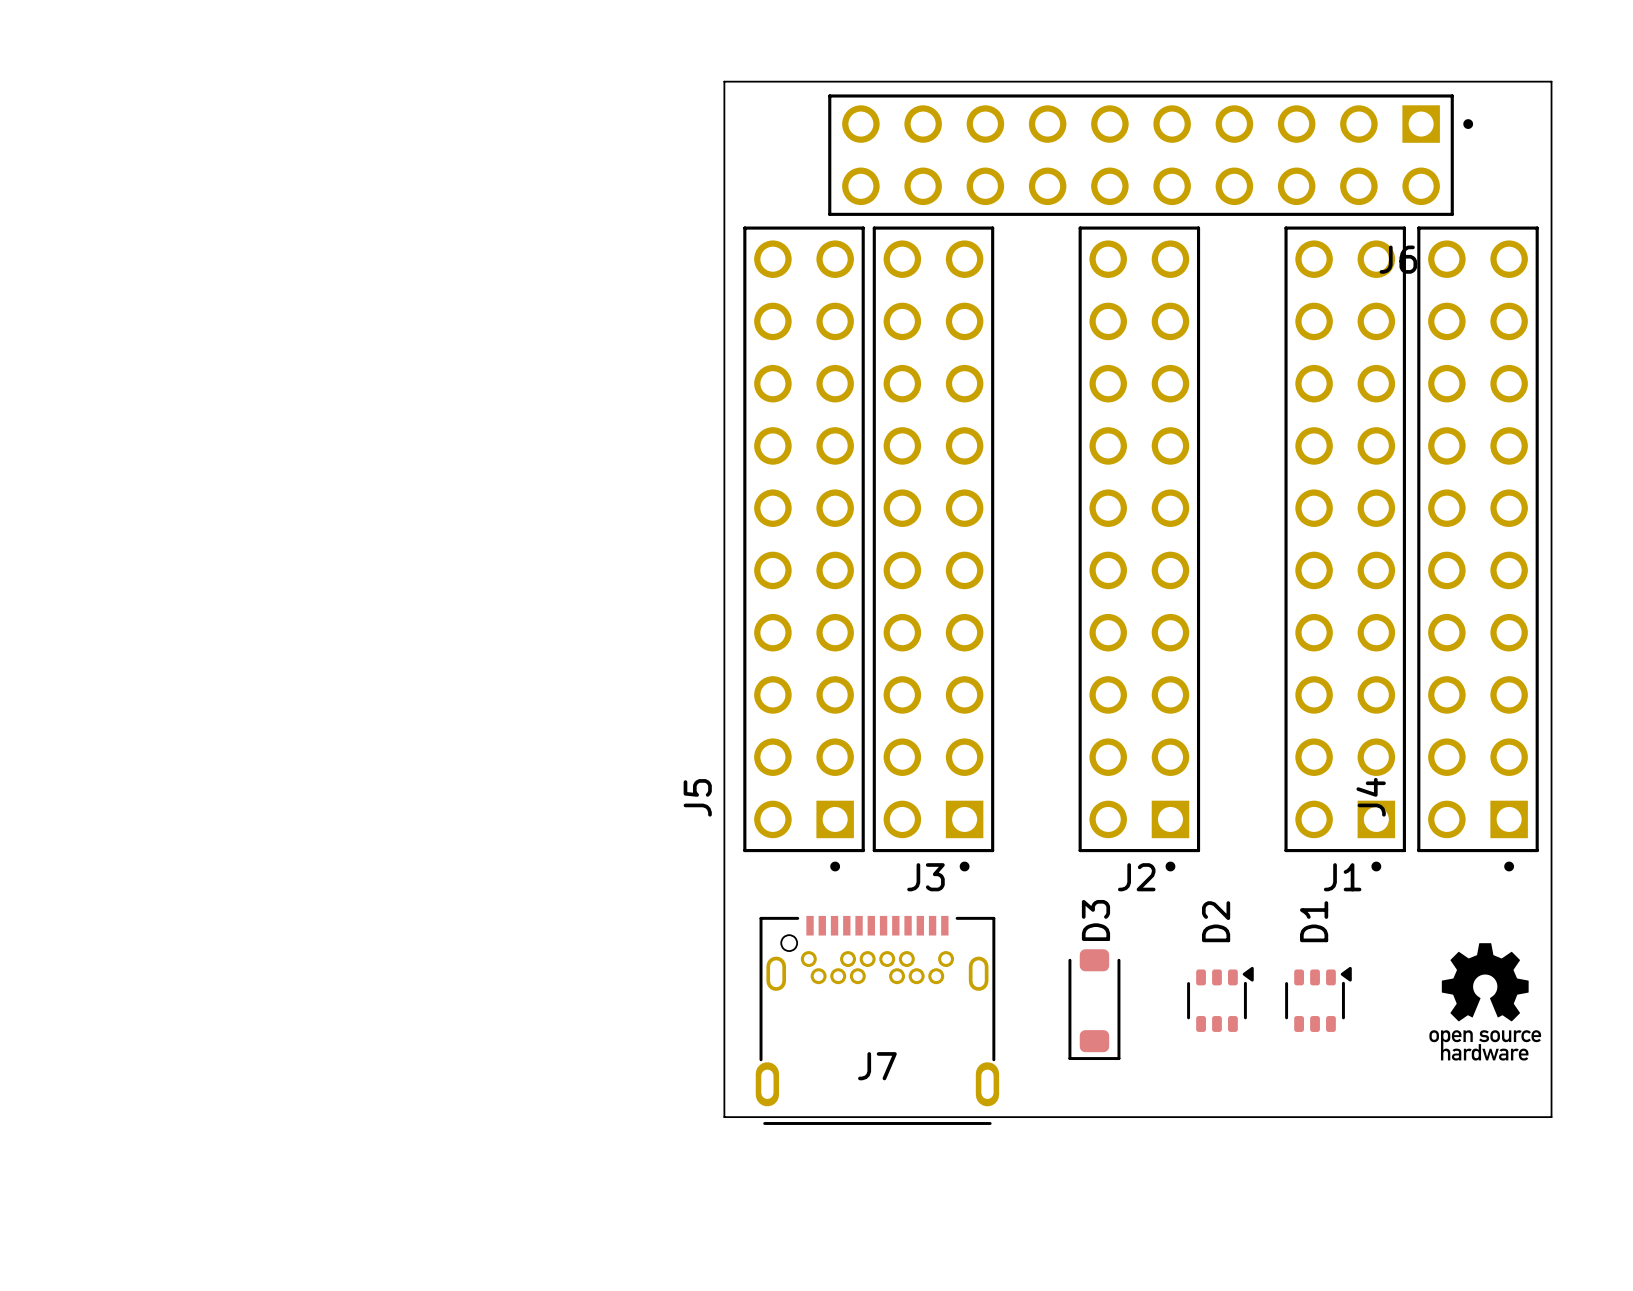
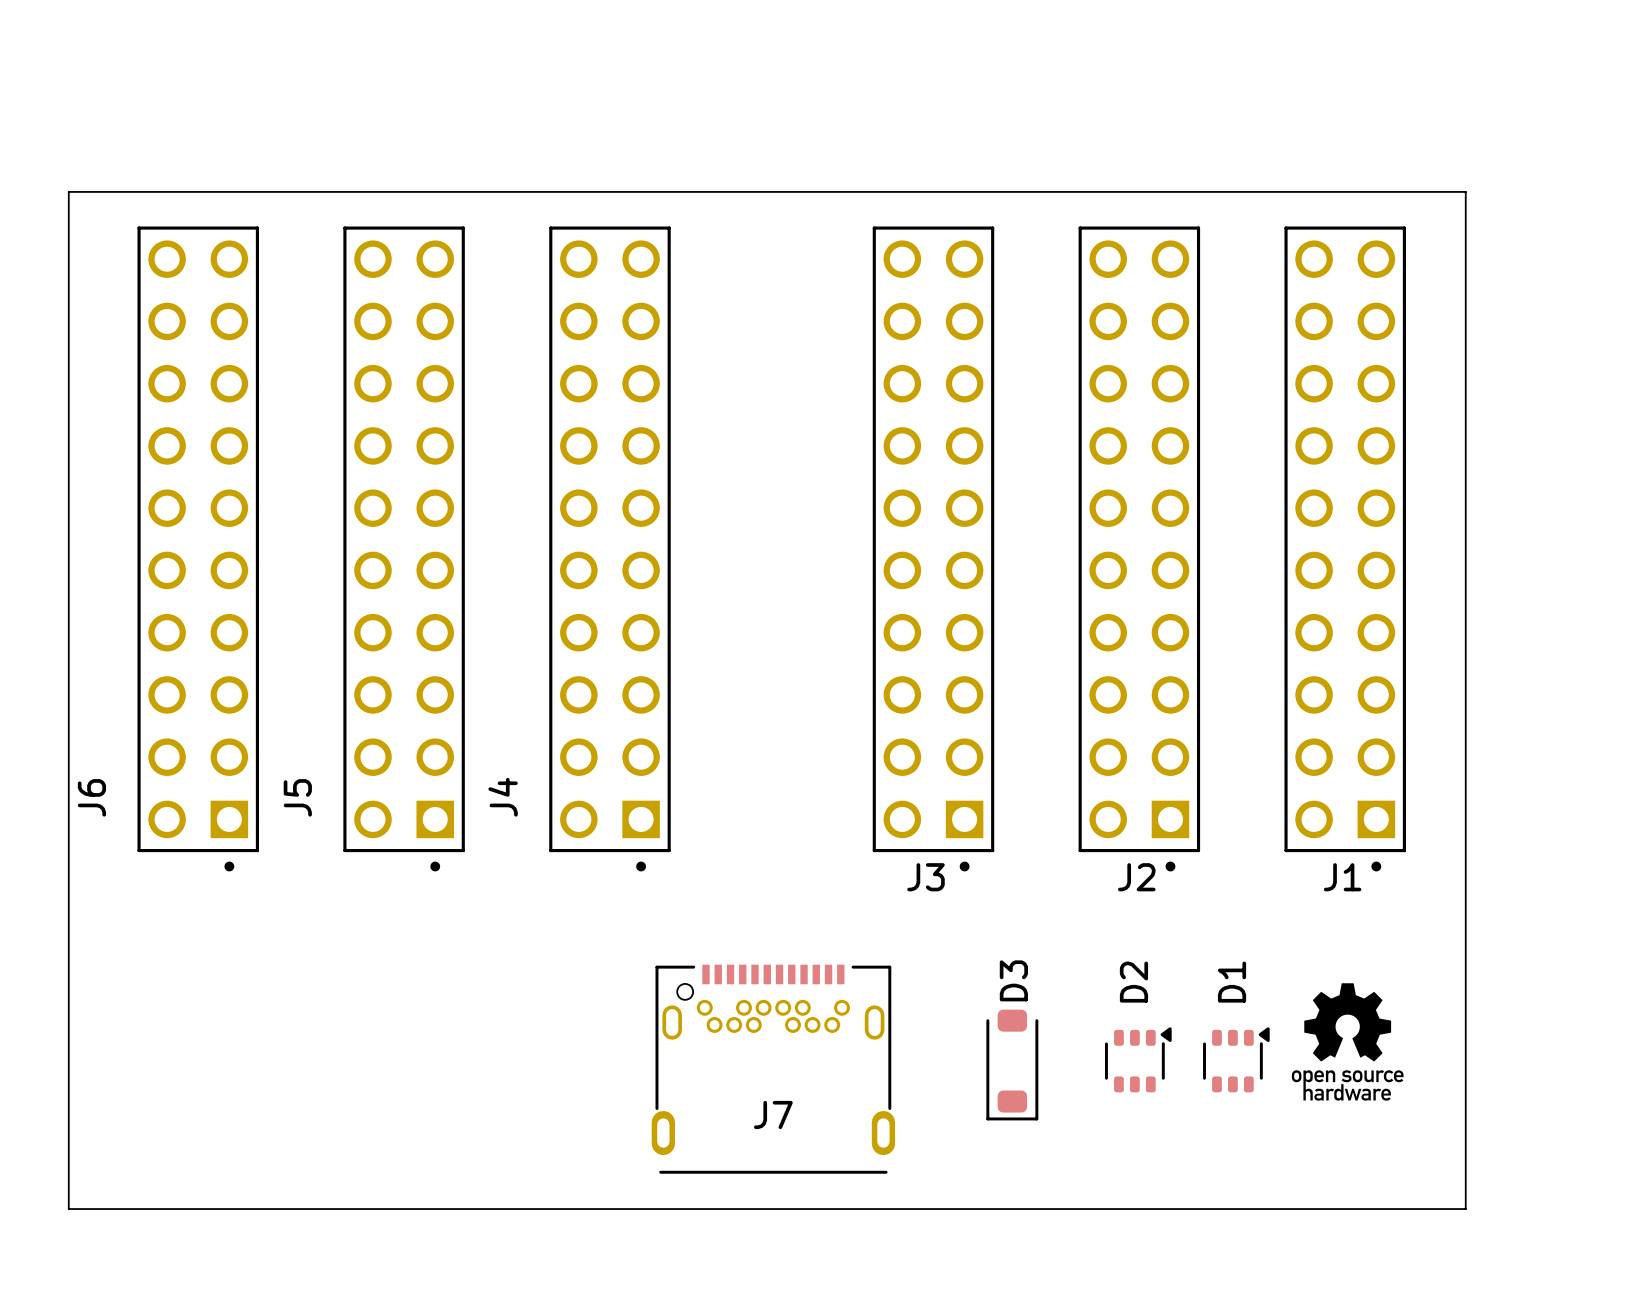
board edge: (724, 81) (1551, 81) (1551, 1117) (724, 1117) (724, 81) -> none
J6 rotation: 0° (1150, 155) -> 90° clockwise (198, 548)
J6 position: (1150, 155) -> (198, 548)
board edge: none -> (68, 191) (1465, 191) (1465, 1209) (68, 1209) (68, 191)
J5 position: (804, 548) -> (404, 548)
J4 position: (1478, 548) -> (609, 548)
drawing position: (1485, 982) -> (1347, 1022)
D2 position: (1220, 999) -> (1138, 1059)
D1 position: (1318, 999) -> (1236, 1059)
D3 position: (1094, 1004) -> (1012, 1065)
J7 position: (877, 1020) -> (773, 1069)
drawing: [1429, 1030, 1542, 1061] -> none
drawing position: (1468, 1036) -> (1330, 1076)
drawing position: (1484, 1036) -> (1346, 1076)
drawing position: (1506, 1036) -> (1369, 1076)
drawing position: (1526, 1036) -> (1388, 1076)
drawing position: (1445, 1045) -> (1308, 1085)
drawing position: (1476, 1052) -> (1338, 1092)
drawing position: (1456, 1054) -> (1319, 1094)
drawing position: (1490, 1054) -> (1353, 1094)
drawing position: (1503, 1054) -> (1366, 1094)
drawing: none -> [1291, 1070, 1404, 1101]

